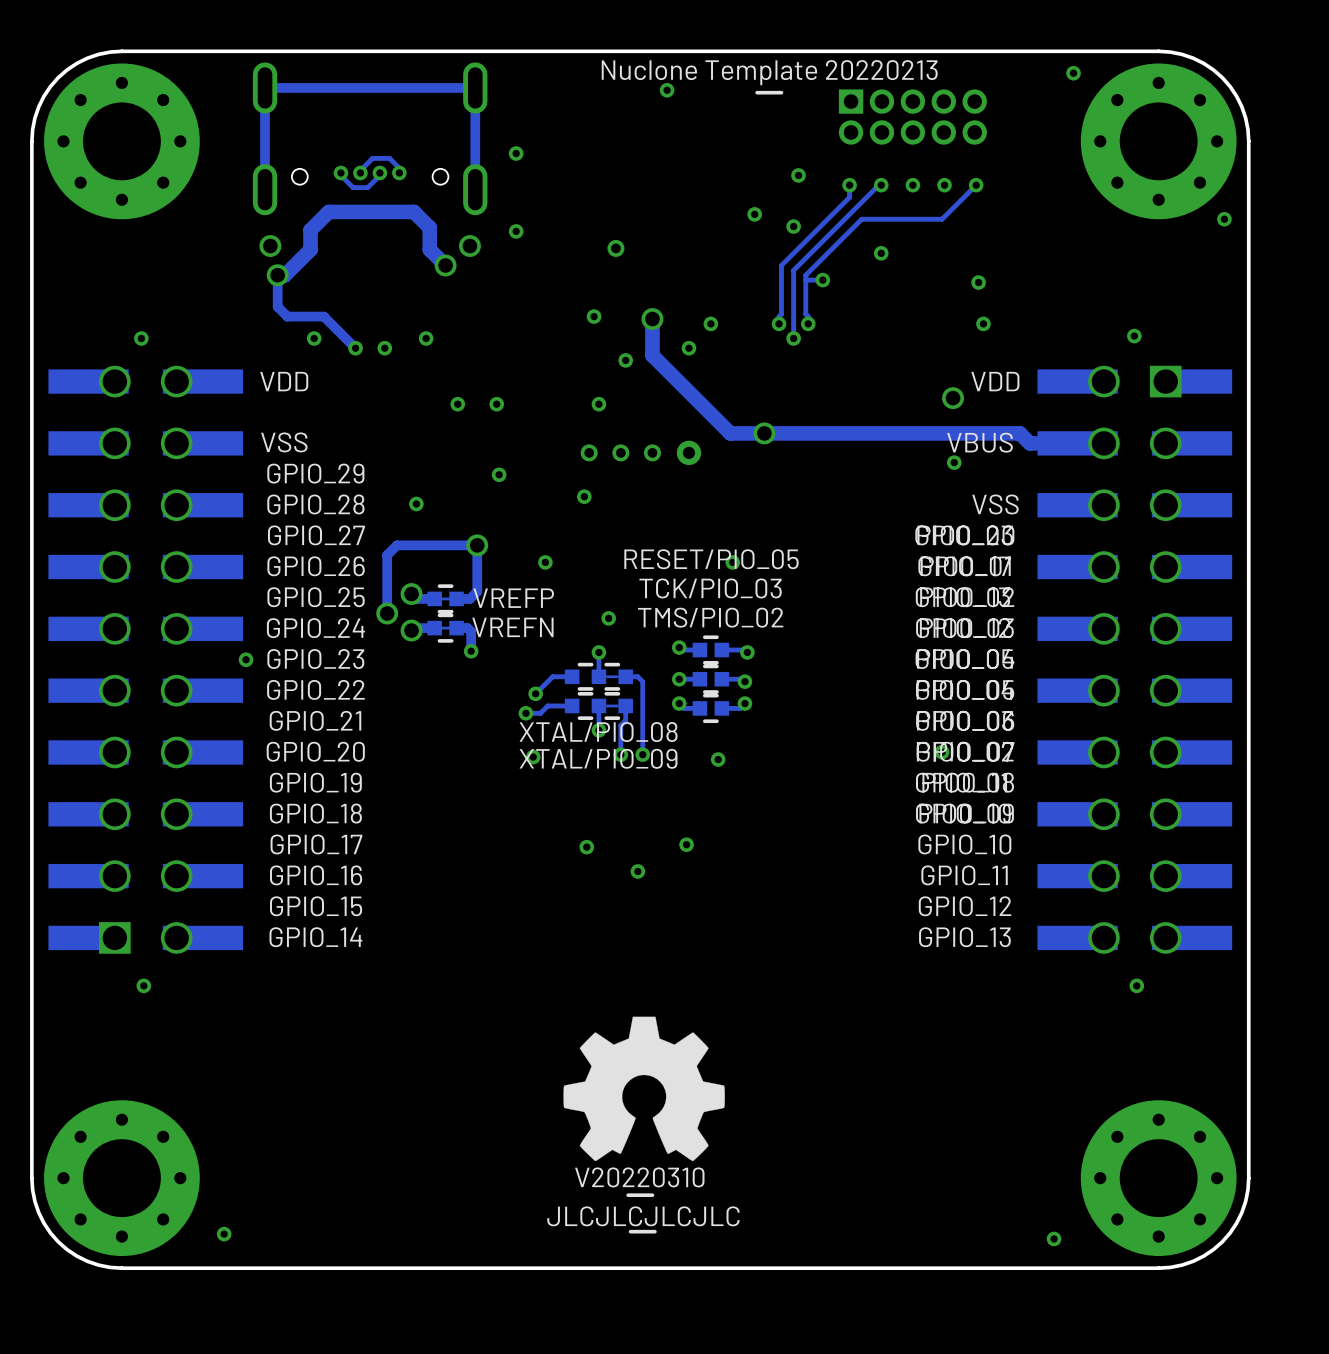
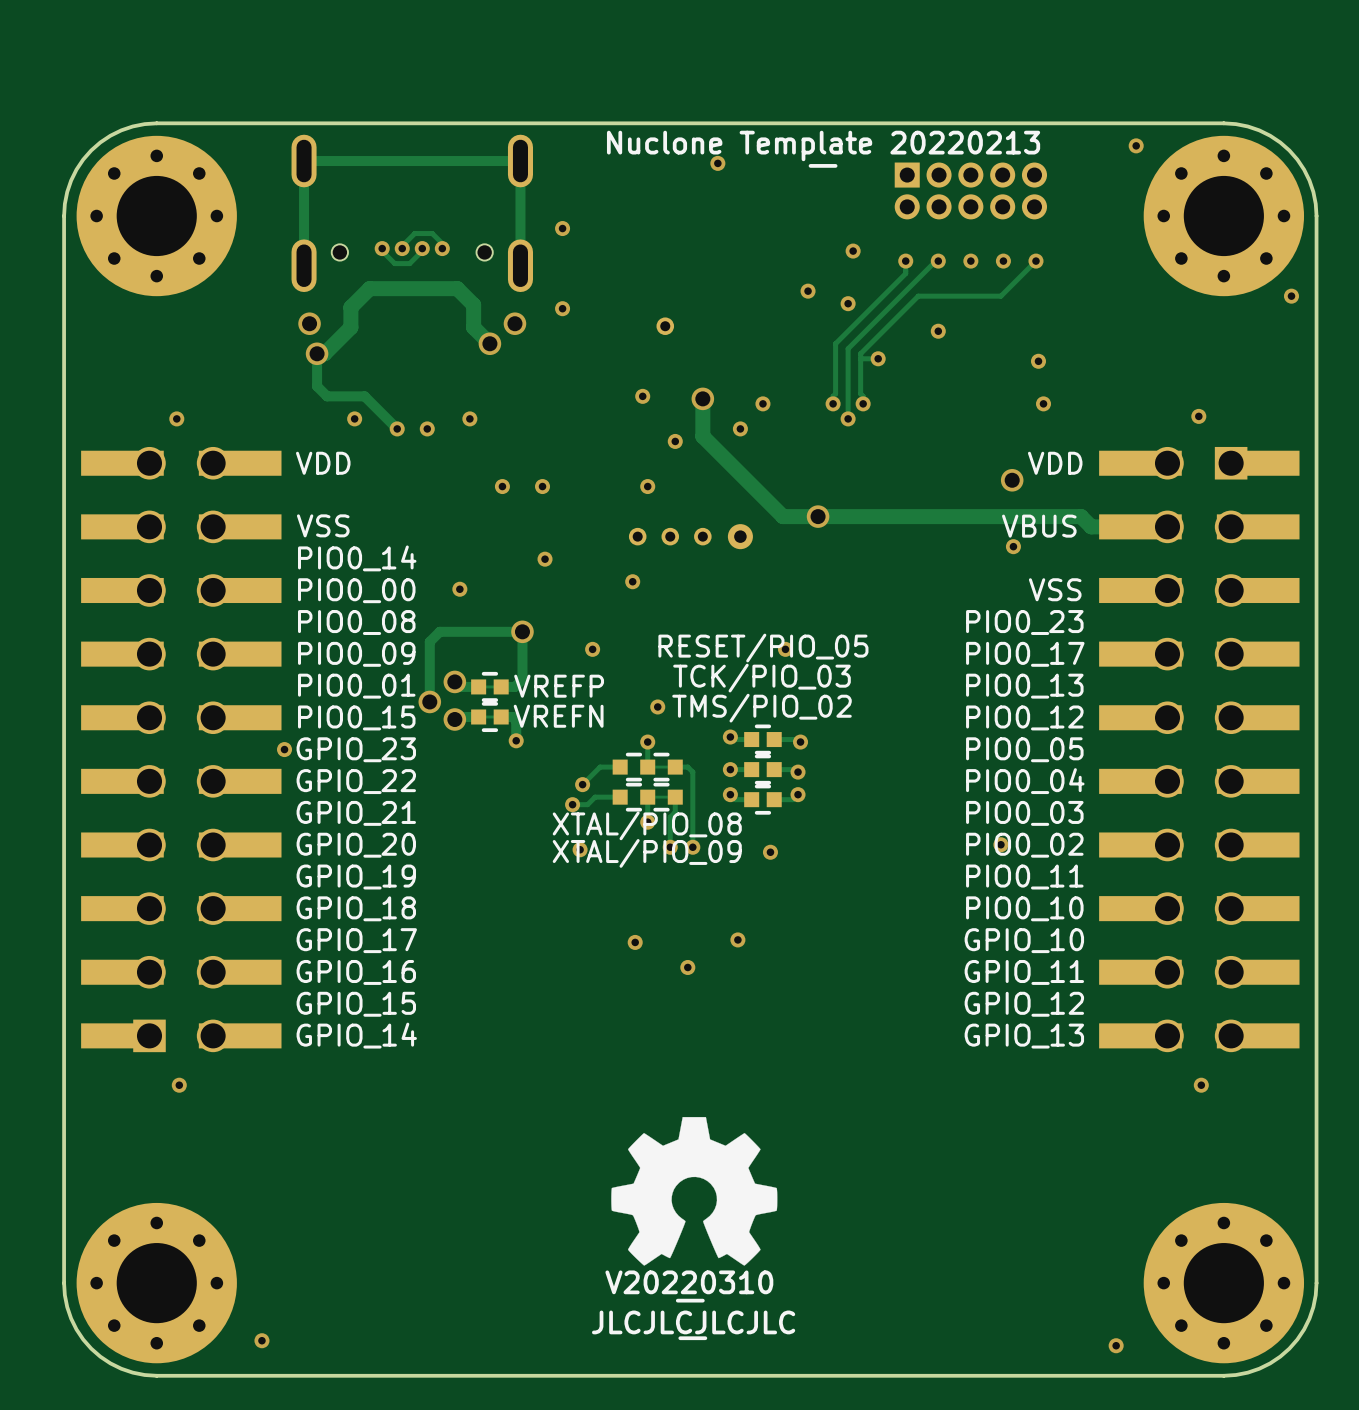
part footprint: [1037, 365, 1233, 954] -> [1099, 446, 1300, 1053]
part text: GPIO_29 (315, 473) -> PIO0_14 (357, 558)
part text: GPIO_28 (315, 504) -> PIO0_00 (356, 590)
part text: GPIO_27 (316, 535) -> PIO0_08 (356, 622)
part text: GPIO_26 (316, 566) -> PIO0_09 (356, 654)
part text: GPIO_25 (316, 597) -> PIO0_01 (356, 686)
part text: GPIO_24 (315, 628) -> PIO0_15 (356, 717)

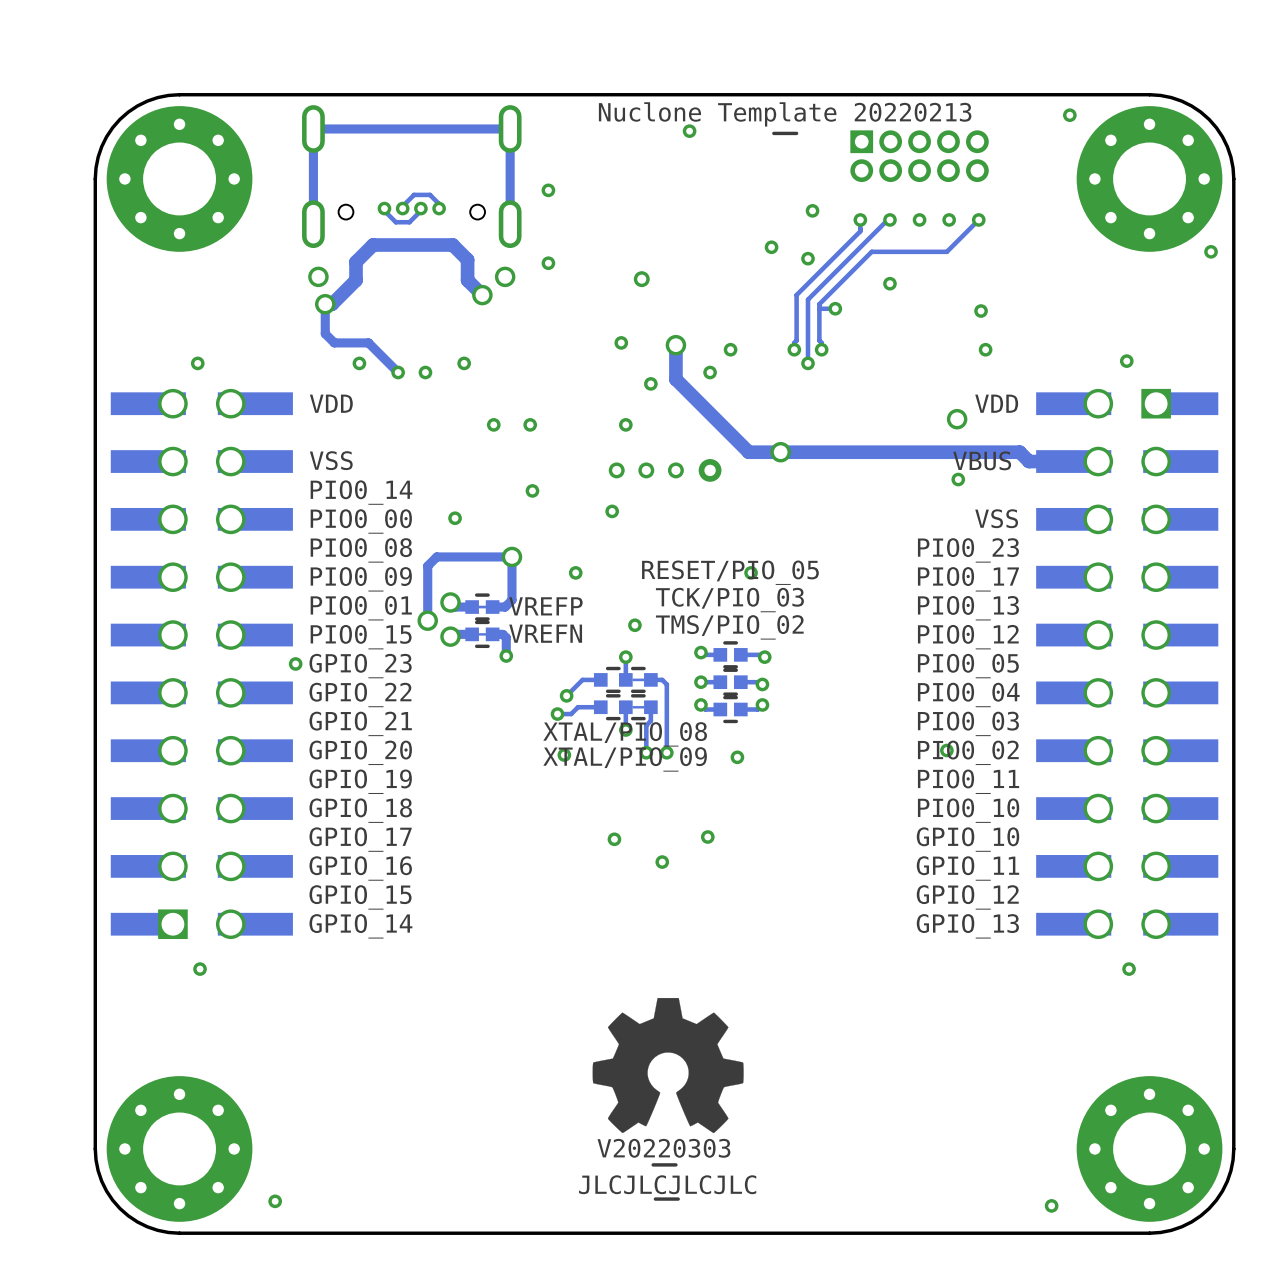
drawing shape: [605, 1270, 774, 1303] -> [597, 1138, 731, 1167]

